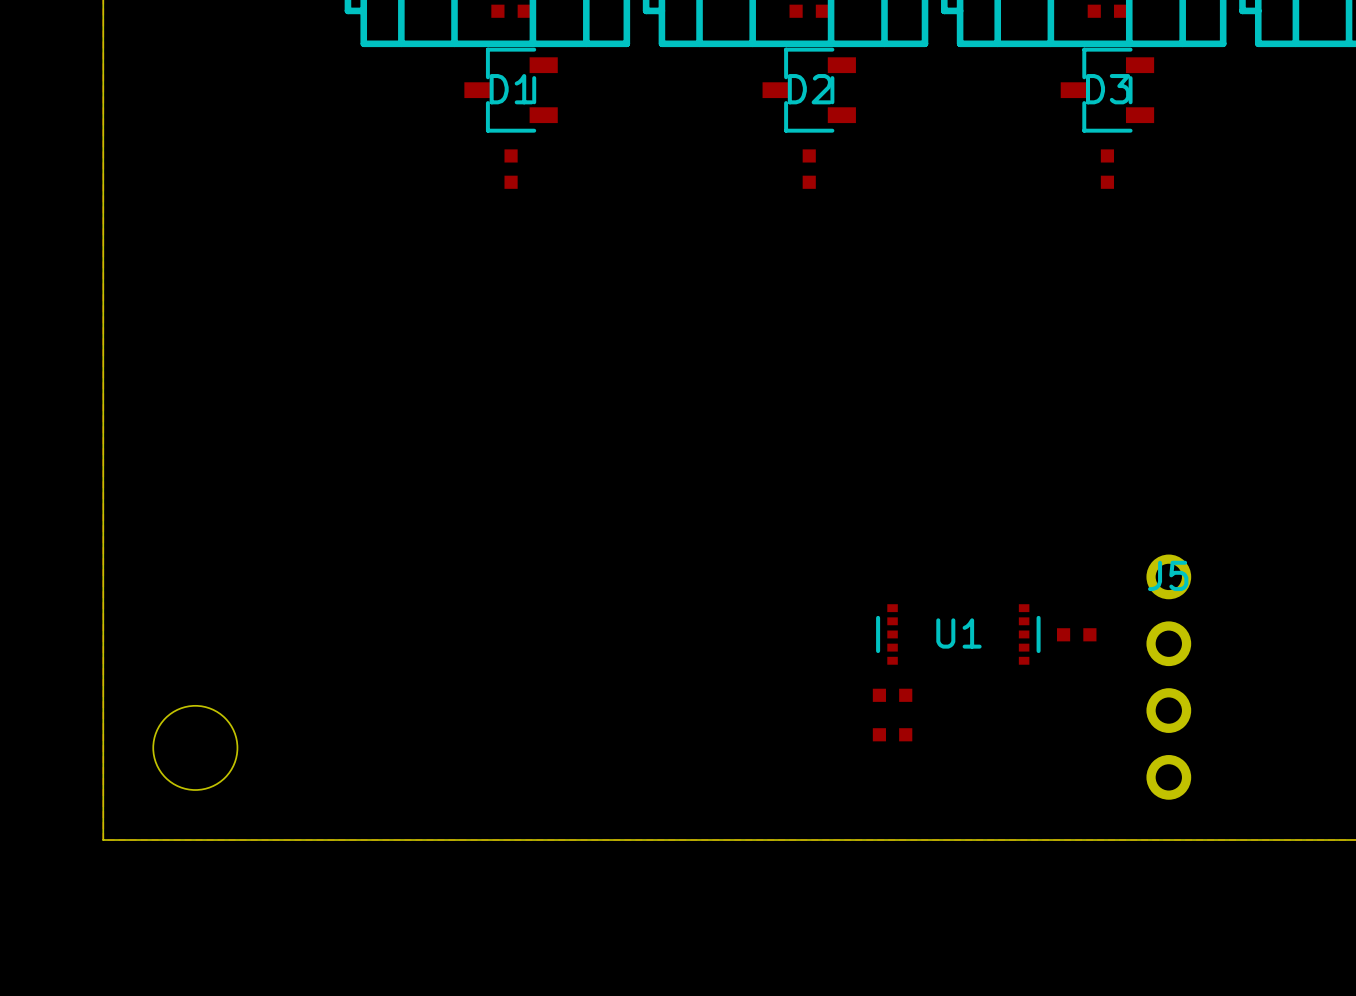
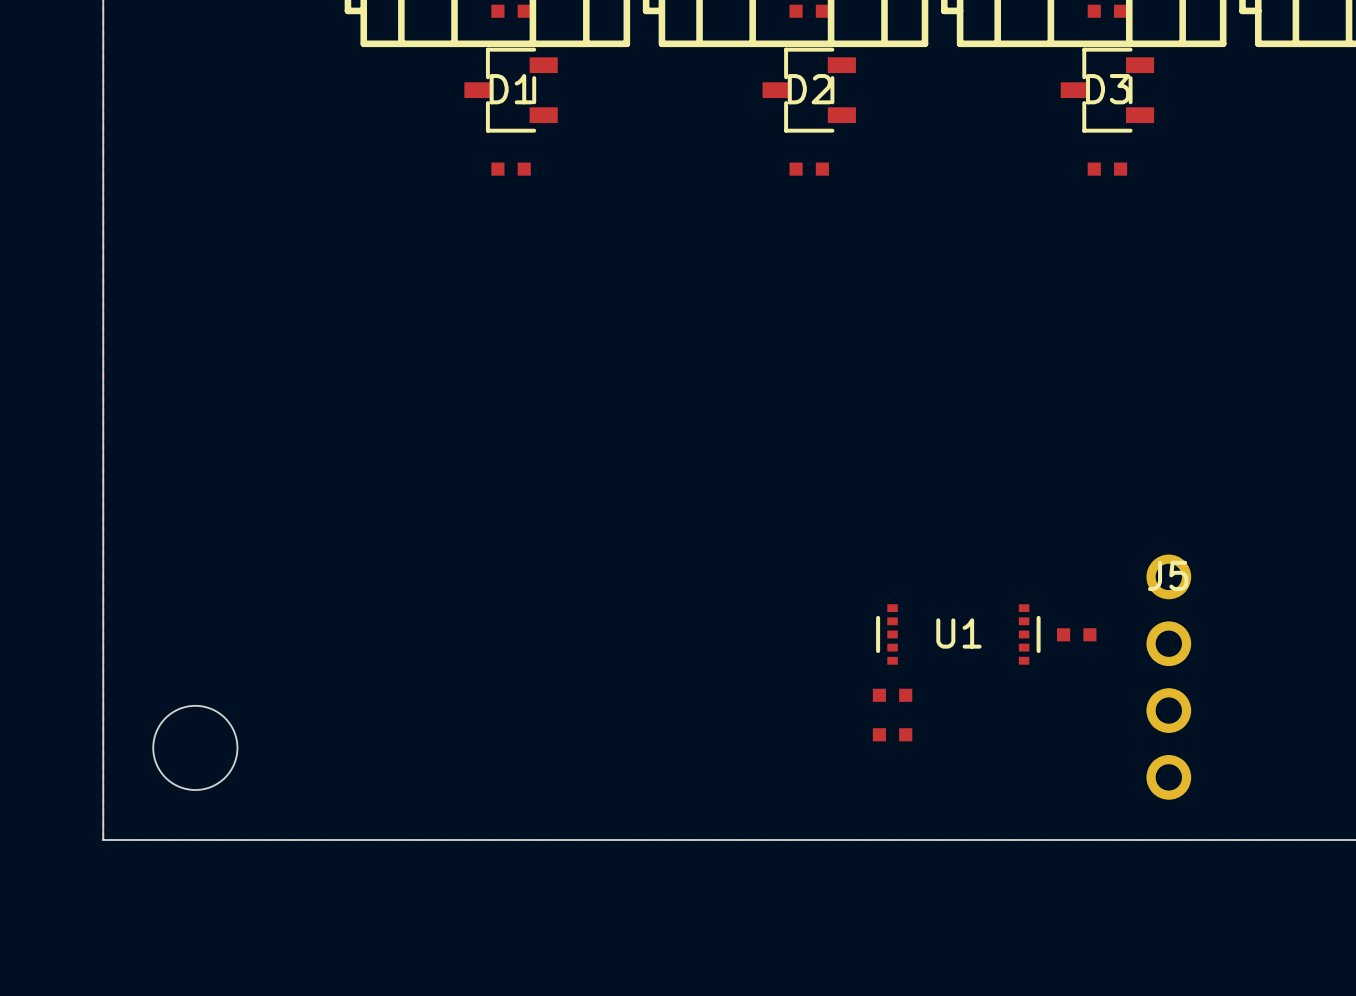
part rotation: 0° (511, 169) -> 90° clockwise (511, 169)
part rotation: 0° (809, 169) -> 90° clockwise (809, 169)
part rotation: 0° (1107, 169) -> 90° clockwise (1107, 169)

